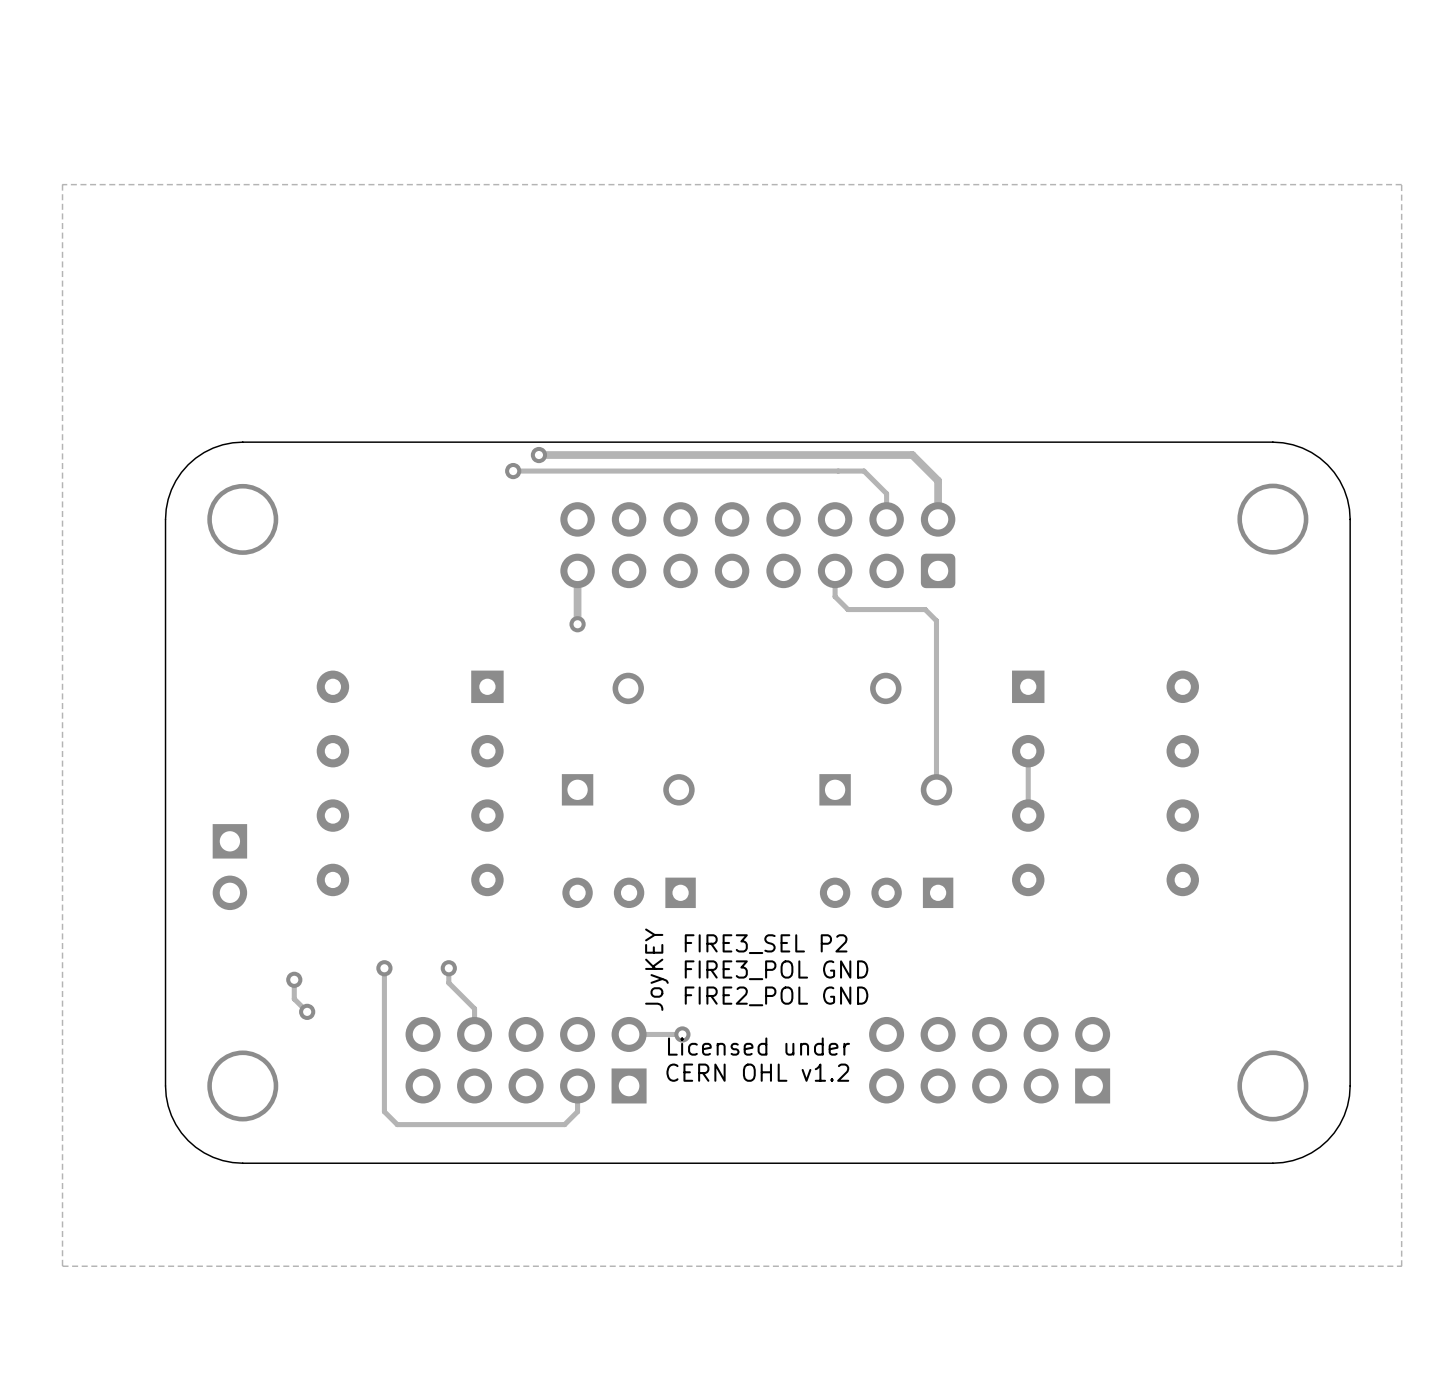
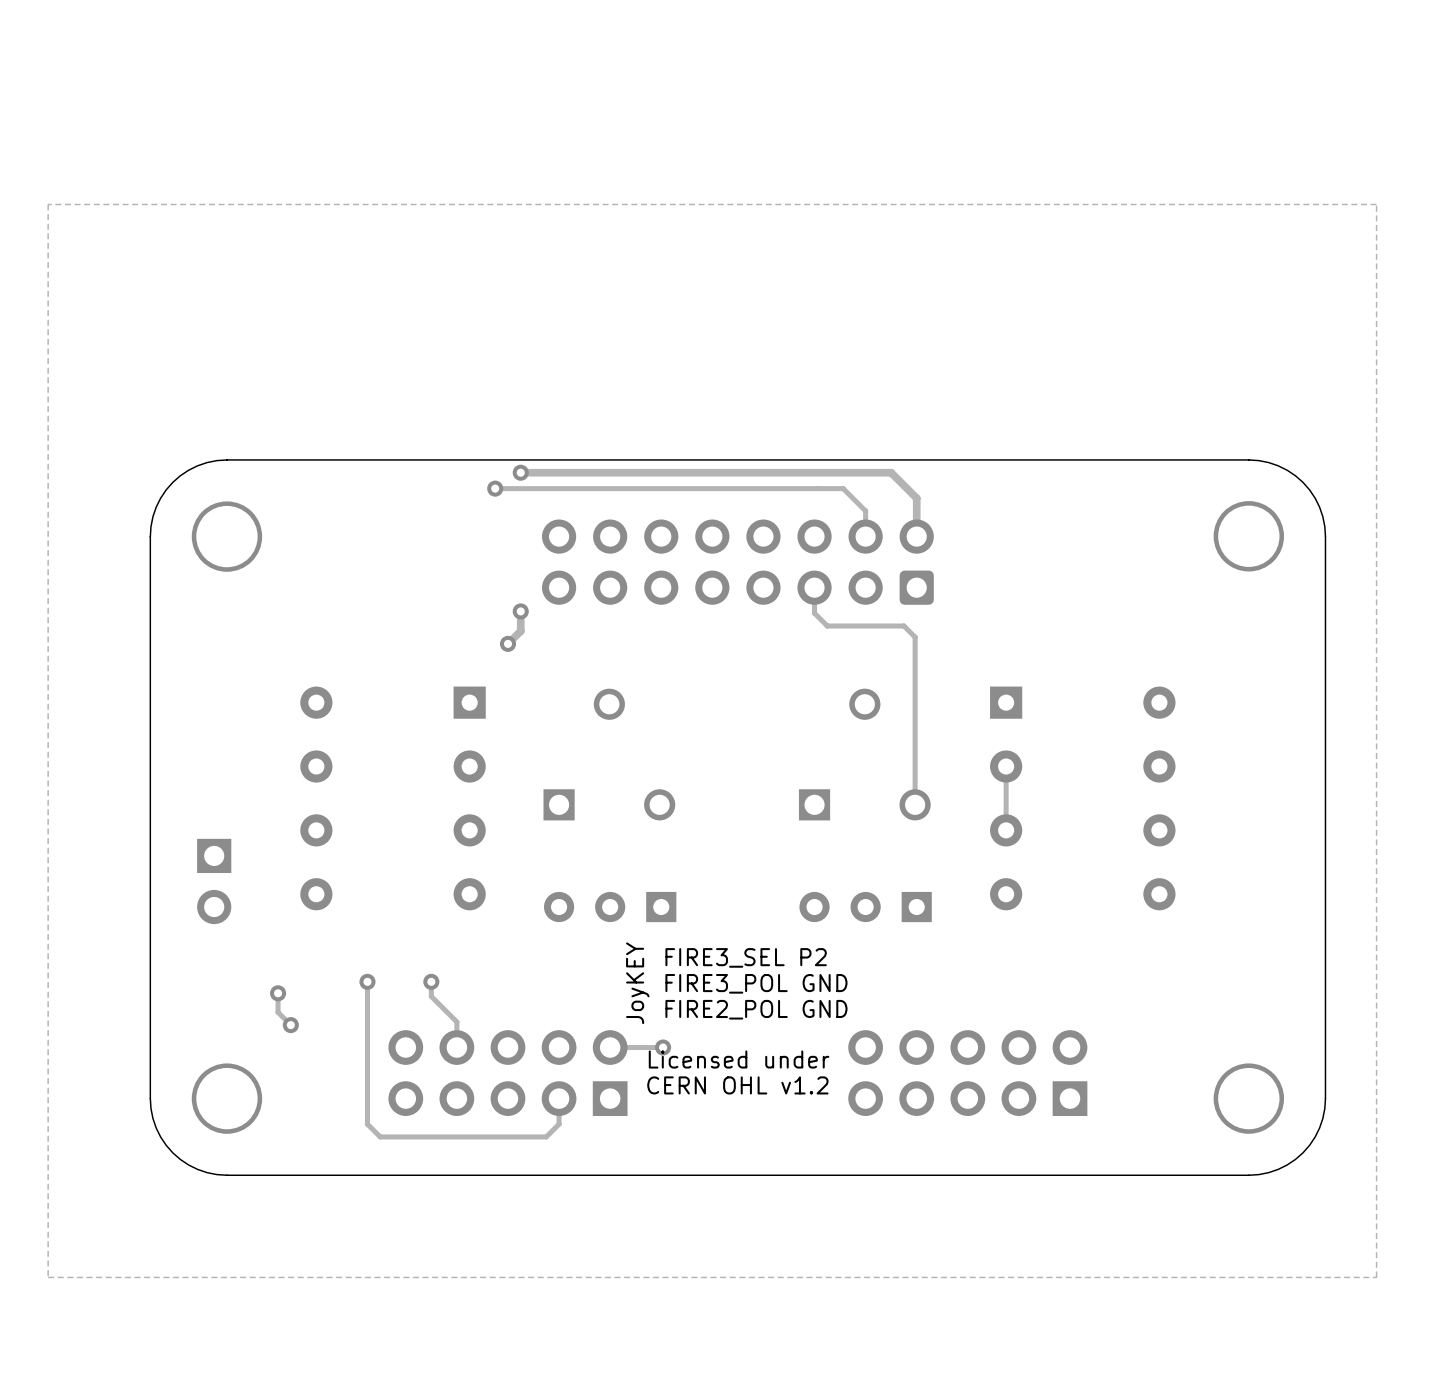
track: (577, 570) (577, 624) -> none
track: none -> (520, 611) (520, 631) (507, 643)
via: none -> (520, 611)
via: (577, 624) -> none
via: none -> (507, 643)

